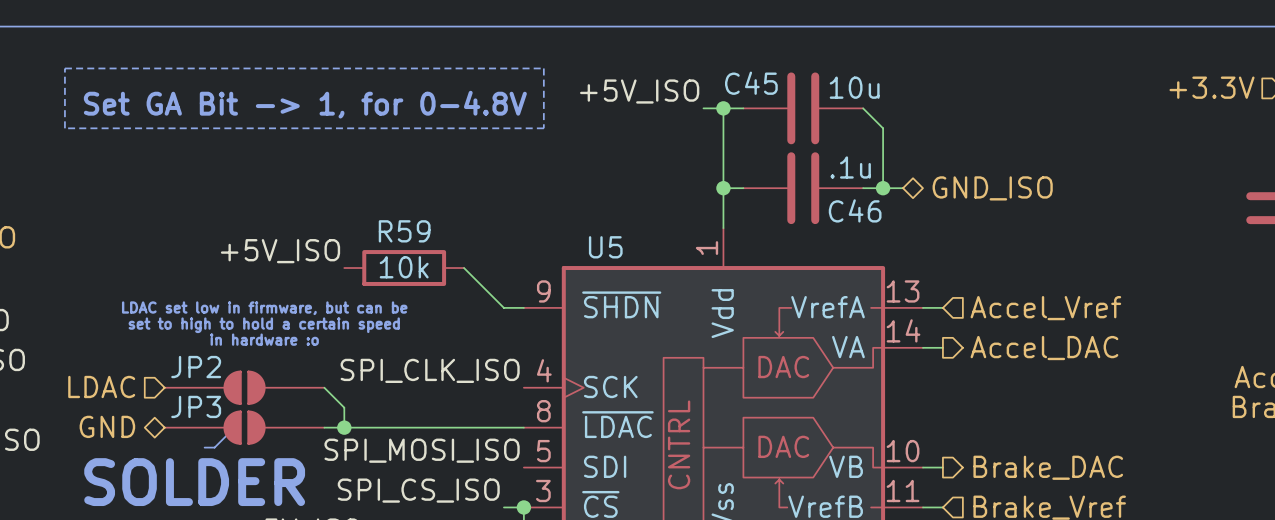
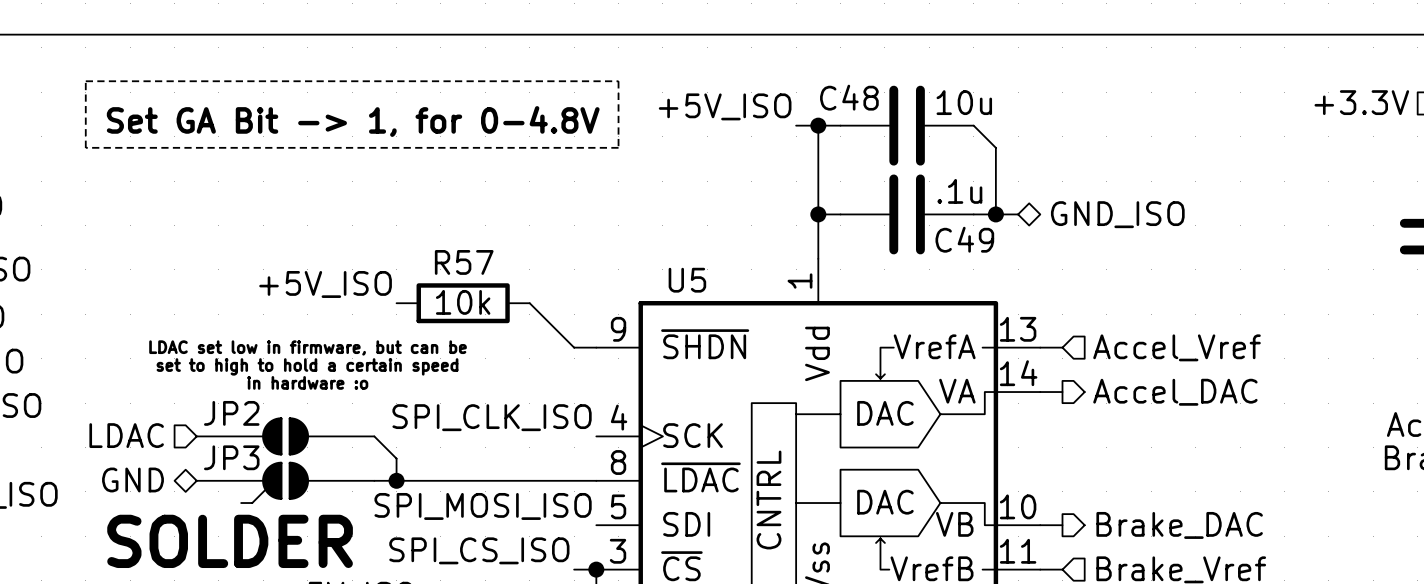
C45 name: C45 (751, 83) -> C48 (849, 97)
C46 name: C46 (855, 210) -> C49 (964, 239)
R59 name: R59 (404, 231) -> R57 (464, 262)

